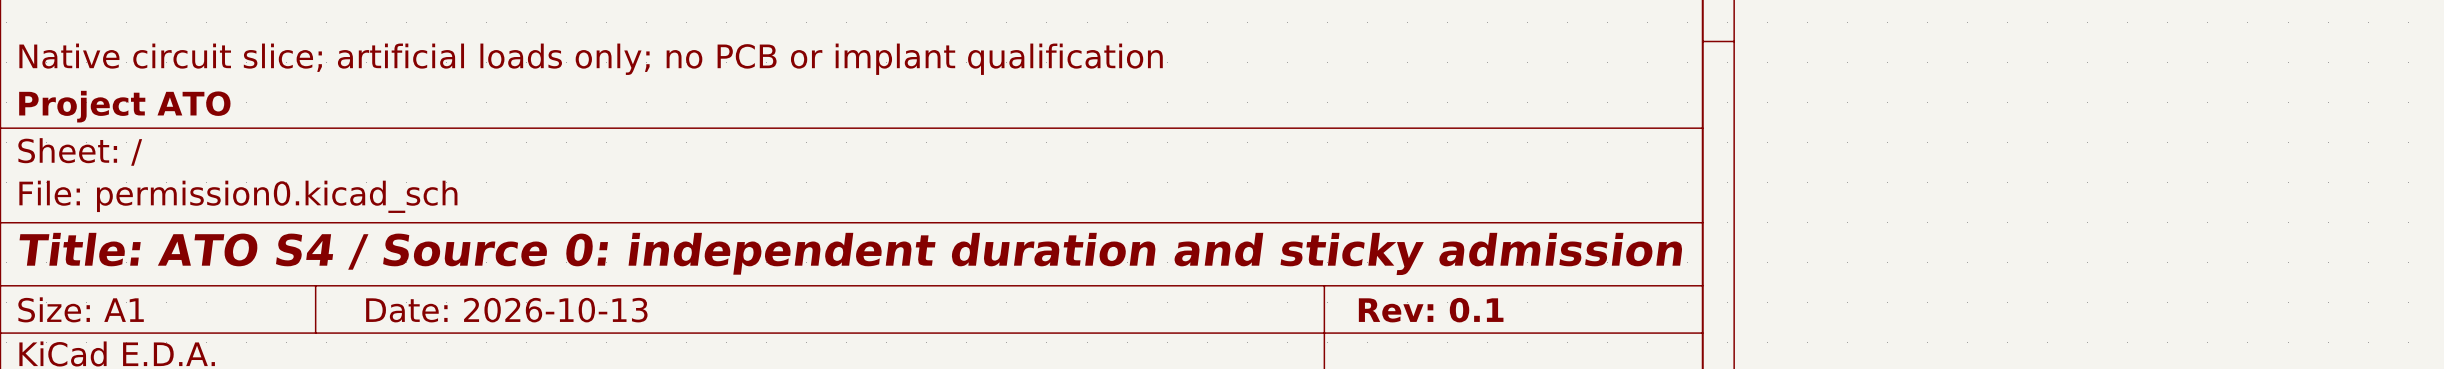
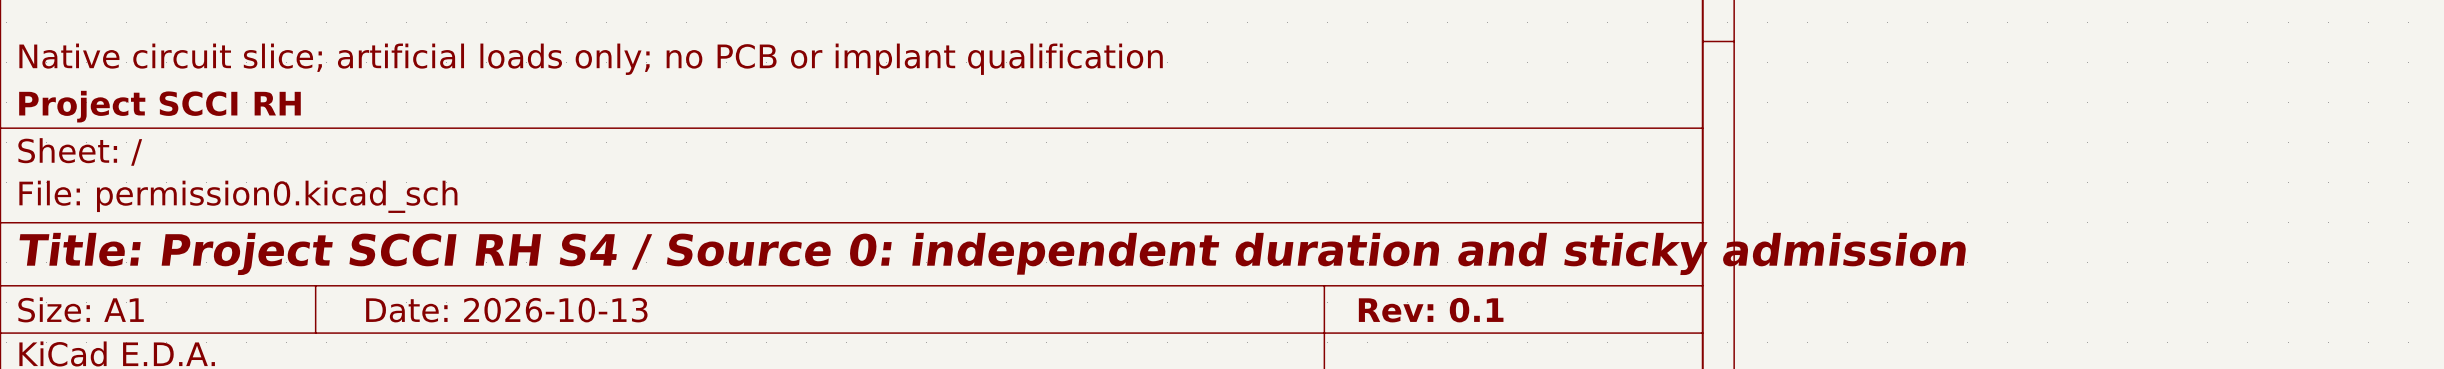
title block: Project ATO (124, 106) -> Project SCCI RH (159, 106)
title block: Title: ATO S4 / Source 0: independent duration and sticky admission (851, 253) -> Title: Project SCCI RH S4 / Source 0: independent duration and sticky admission (992, 253)

